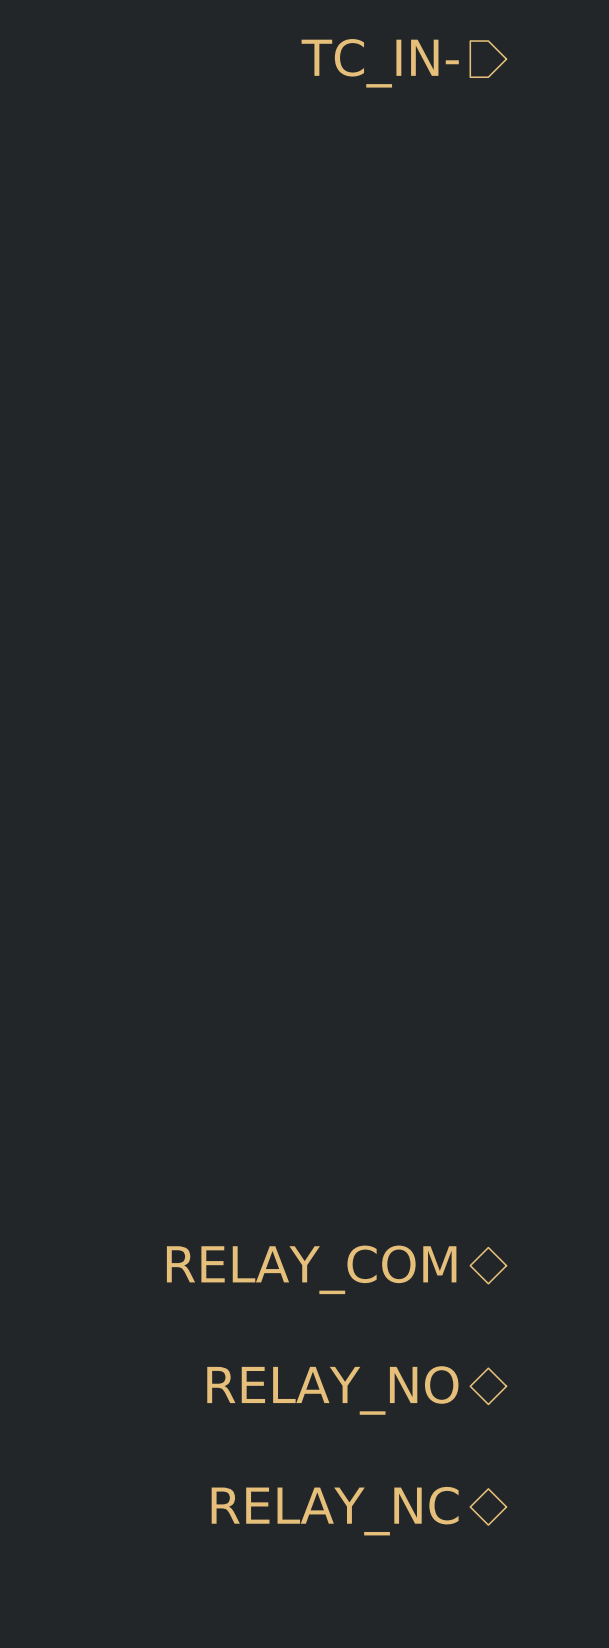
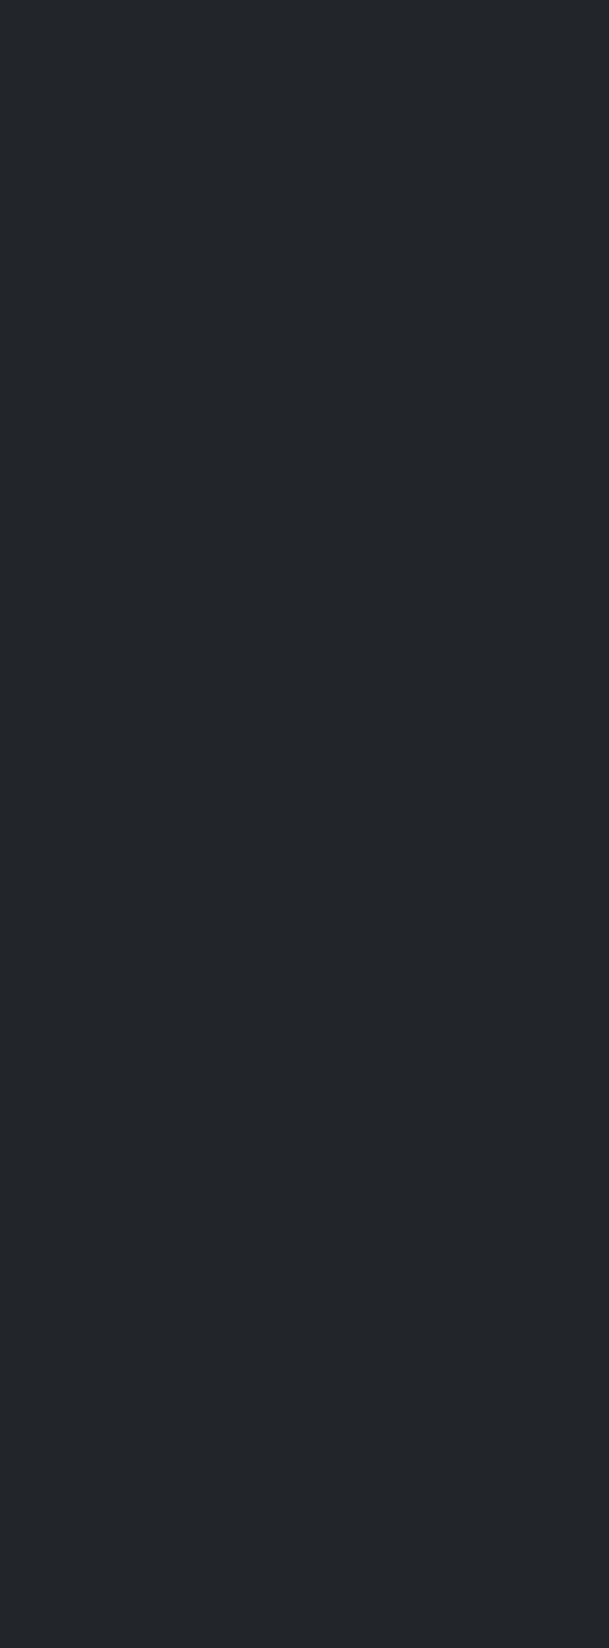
hierarchical label: TC_IN- (380, 63) -> none
hierarchical label: RELAY_COM (311, 1269) -> none
hierarchical label: RELAY_NO (332, 1390) -> none
hierarchical label: RELAY_NC (335, 1511) -> none

